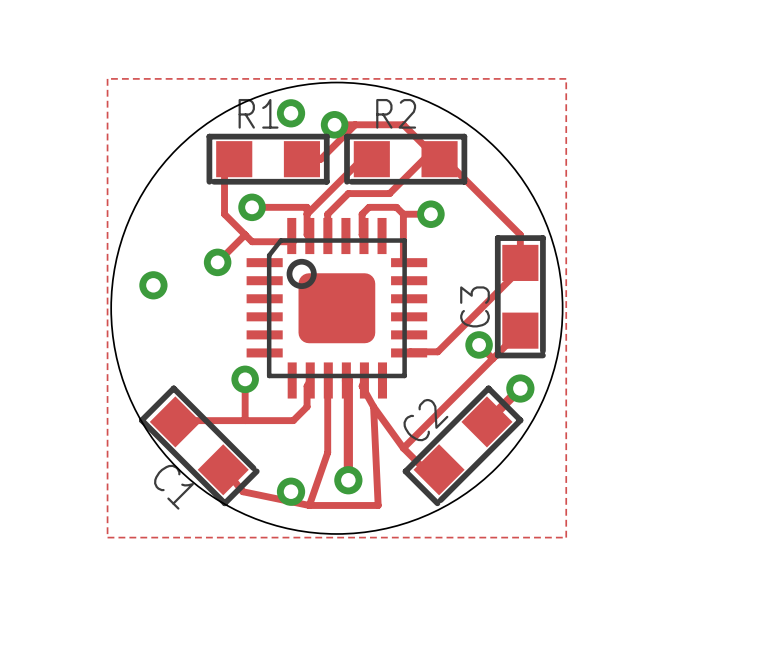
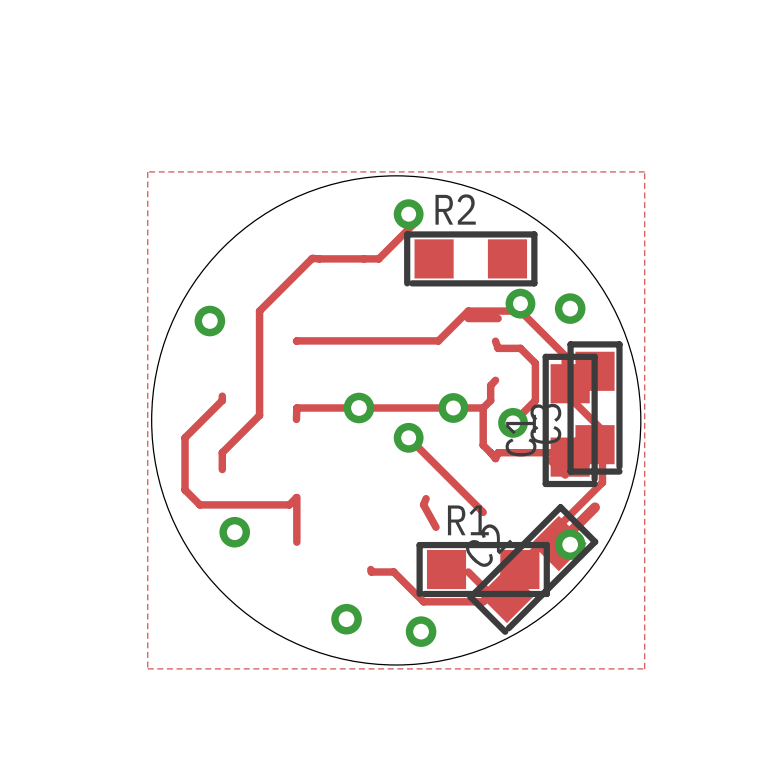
via: (291, 113) -> none
track: (334, 124) (403, 124) (437, 159) (444, 159) (520, 234) (520, 269) (437, 351) (409, 352) -> none
via position: (334, 124) -> (408, 214)
track: none -> (312, 258) (358, 258)
track: (234, 159) (231, 159) (224, 166) (224, 214) (252, 241) (293, 241) (291, 236) -> none
track: none -> (311, 258) (259, 311) (259, 415) (222, 452) (222, 469)
R1 position: (268, 159) -> (483, 569)
track: (371, 159) (362, 159) (307, 214) -> none
track: (439, 159) (430, 152) (389, 193) (348, 193) (327, 214) (327, 236) -> none
via: none -> (570, 308)
track: (252, 207) (307, 207) (307, 234) (309, 236) -> none
via: (252, 207) -> none
track: none -> (520, 311) (565, 355) (565, 378) (572, 385) (572, 400) (602, 430) (602, 482) (520, 564) (519, 569) (513, 571) (483, 601) (423, 601) (393, 571) (371, 571) (370, 569)
via position: (430, 214) -> (520, 303)
via: none -> (209, 321)
track: (245, 234) (217, 262) -> (296, 340) (438, 340) (468, 311) (520, 311)
track: none -> (495, 341) (498, 348) (520, 348) (535, 363) (535, 400) (513, 422)
track: (363, 236) (362, 234) (362, 214) (368, 207) (396, 207) (403, 214) (403, 262) (409, 262) -> none
via: (217, 262) -> none
track: none -> (495, 380) (490, 385) (490, 400) (483, 407)
via: (153, 285) -> none
track: none -> (222, 396) (222, 400) (185, 437) (185, 489) (199, 504) (289, 504) (296, 497)
via: none -> (358, 407)
via: none -> (453, 407)
track: none -> (483, 407) (483, 445) (495, 458) (498, 452) (565, 452) (570, 457)
track: none -> (483, 407) (296, 407) (296, 419)
part: (336, 308) -> none
via: none -> (513, 422)
track: none -> (408, 437) (483, 512)
via: none -> (408, 437)
track: (520, 331) (403, 448) (373, 406) (378, 505) (309, 505) -> none
via: (479, 344) -> none
via: (245, 379) -> none
track: (310, 380) (307, 386) (307, 406) (293, 420) (175, 421) -> none
track: (328, 380) (327, 452) (309, 505) -> none
track: (346, 380) (348, 380) (348, 480) -> none
via position: (520, 388) -> (570, 544)
via: none -> (234, 532)
C1 rotation: 0° (199, 445) -> 45° clockwise (570, 420)
C1 position: (199, 445) -> (570, 420)
track: (223, 469) (224, 468) (242, 491) (309, 505) -> none
via position: (348, 480) -> (421, 631)

